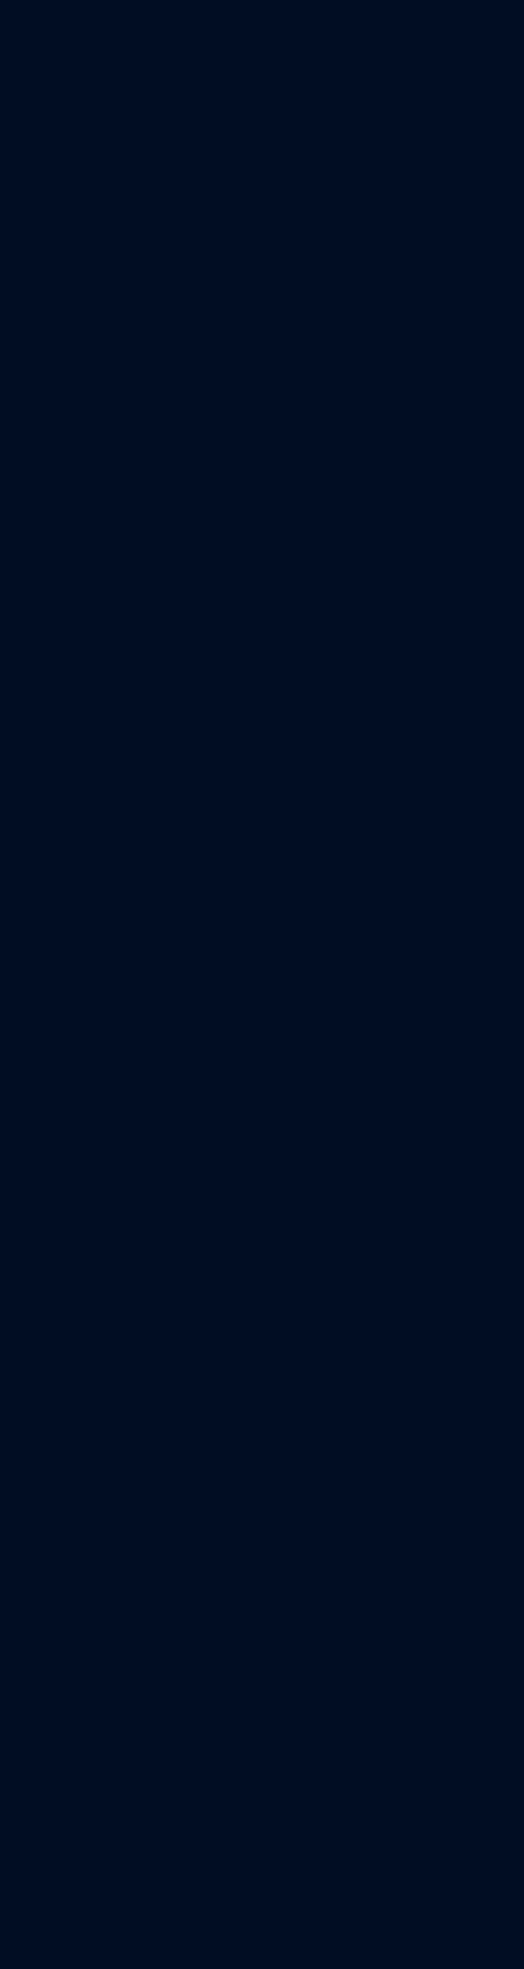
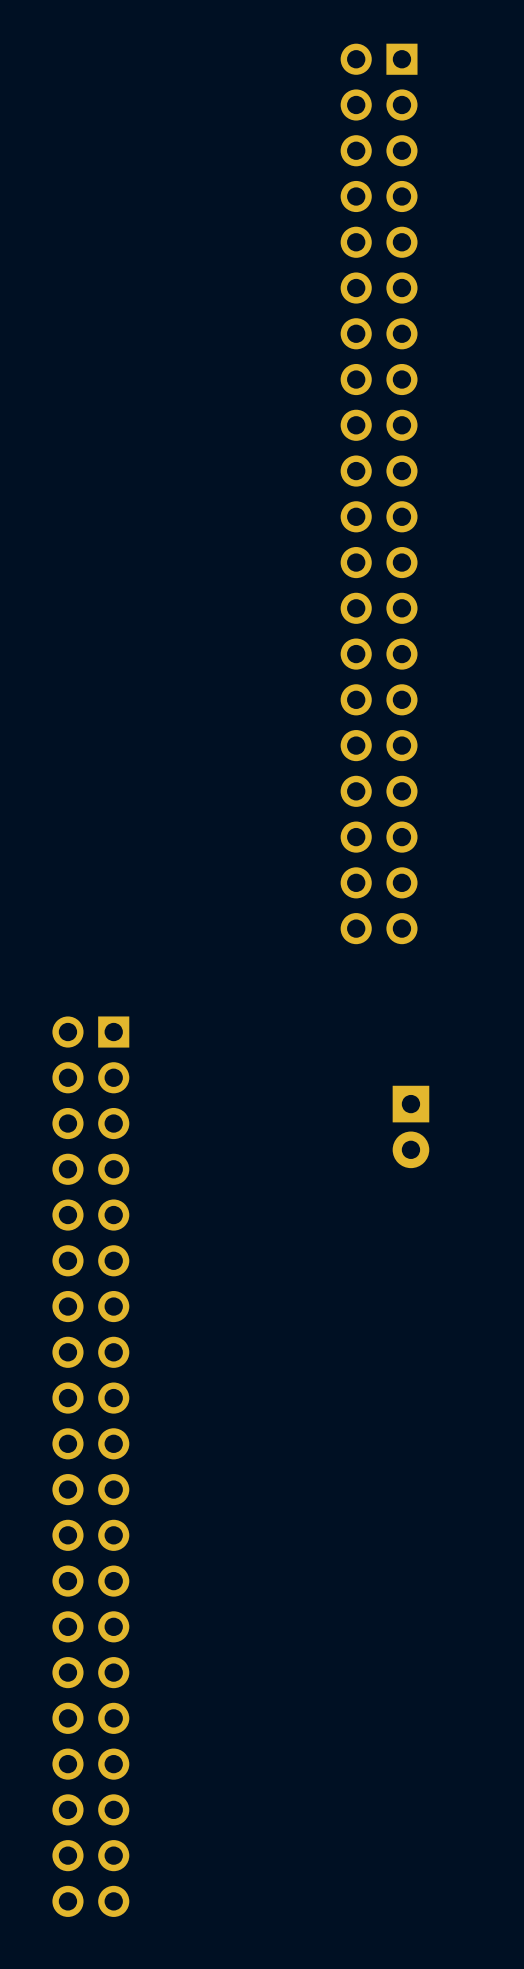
part: none -> (379, 493)
part: none -> (410, 1126)
part: none -> (90, 1466)

